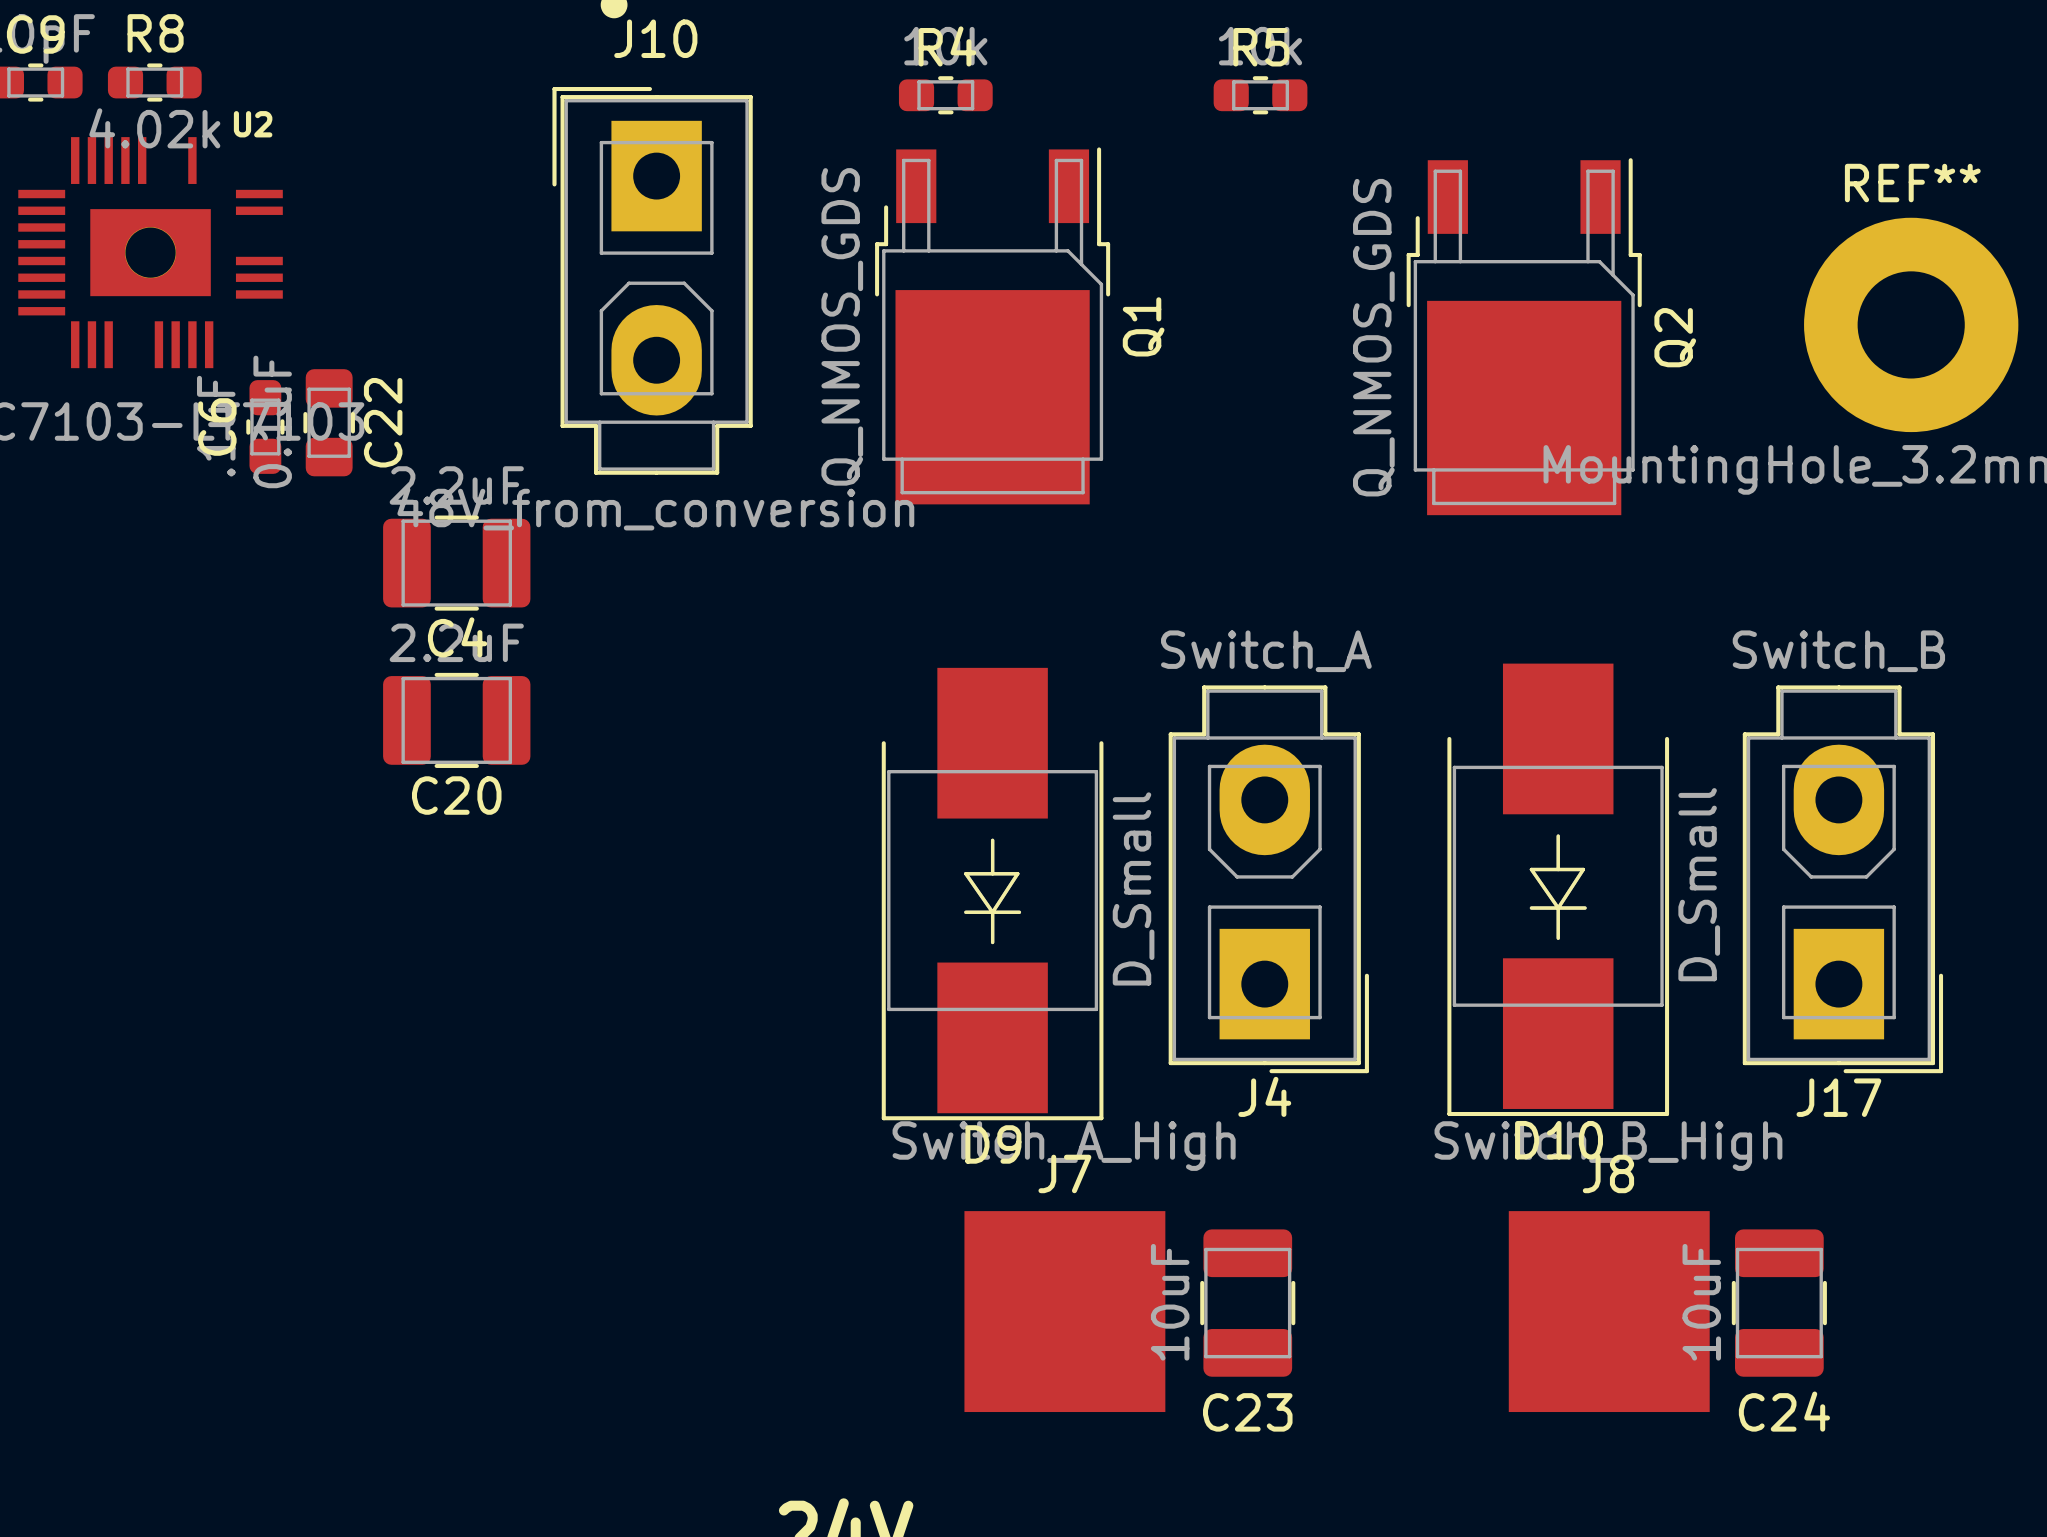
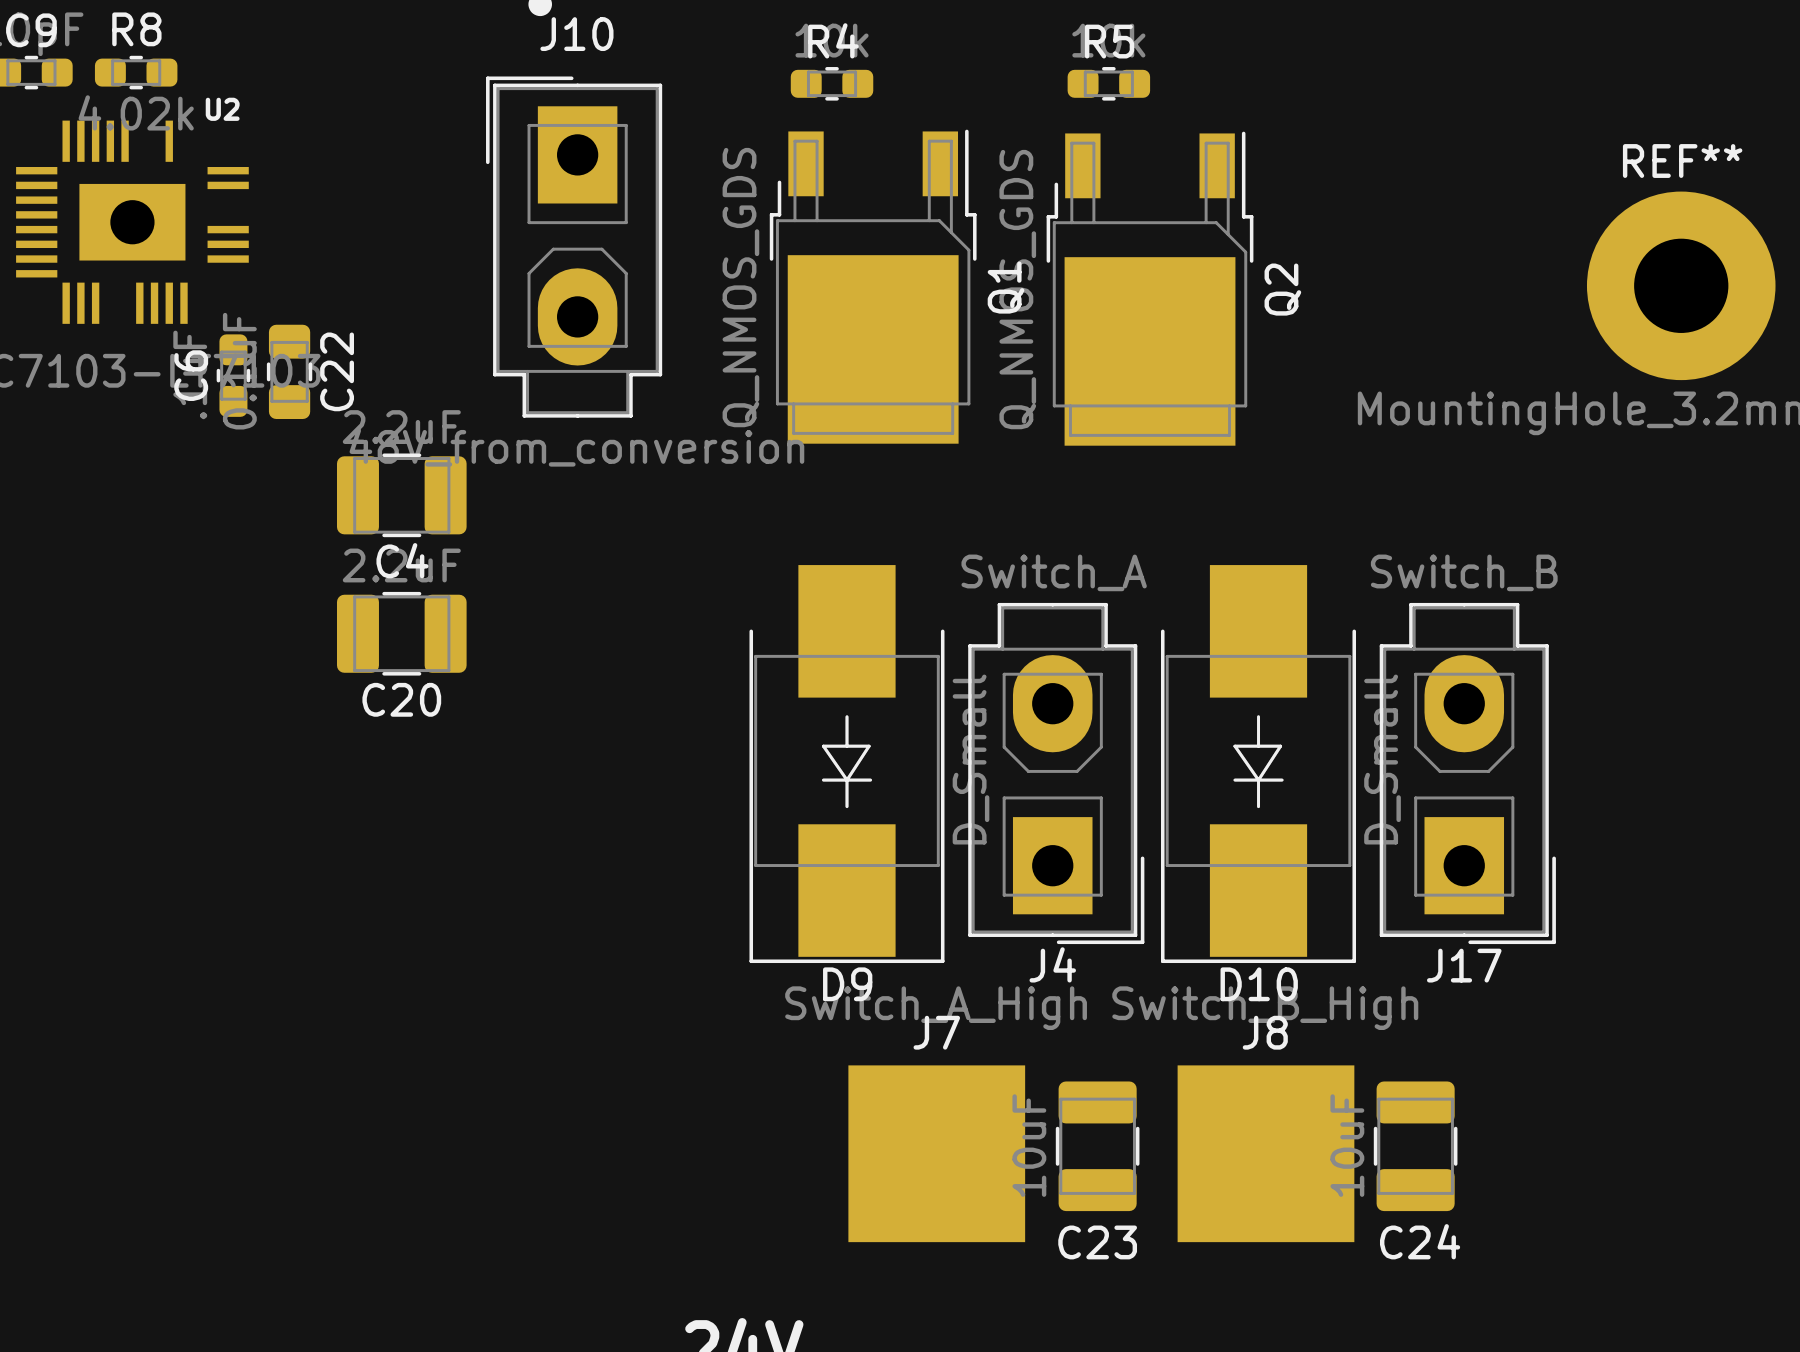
Q2 position: (1524, 336) -> (1150, 288)
J4 position: (1268, 879) -> (1056, 773)
J17 position: (1842, 879) -> (1467, 773)
D10 position: (1558, 889) -> (1258, 764)
D9 position: (992, 894) -> (846, 764)
C24 position: (1779, 1303) -> (1415, 1146)
J8 position: (1609, 1311) -> (1265, 1153)

